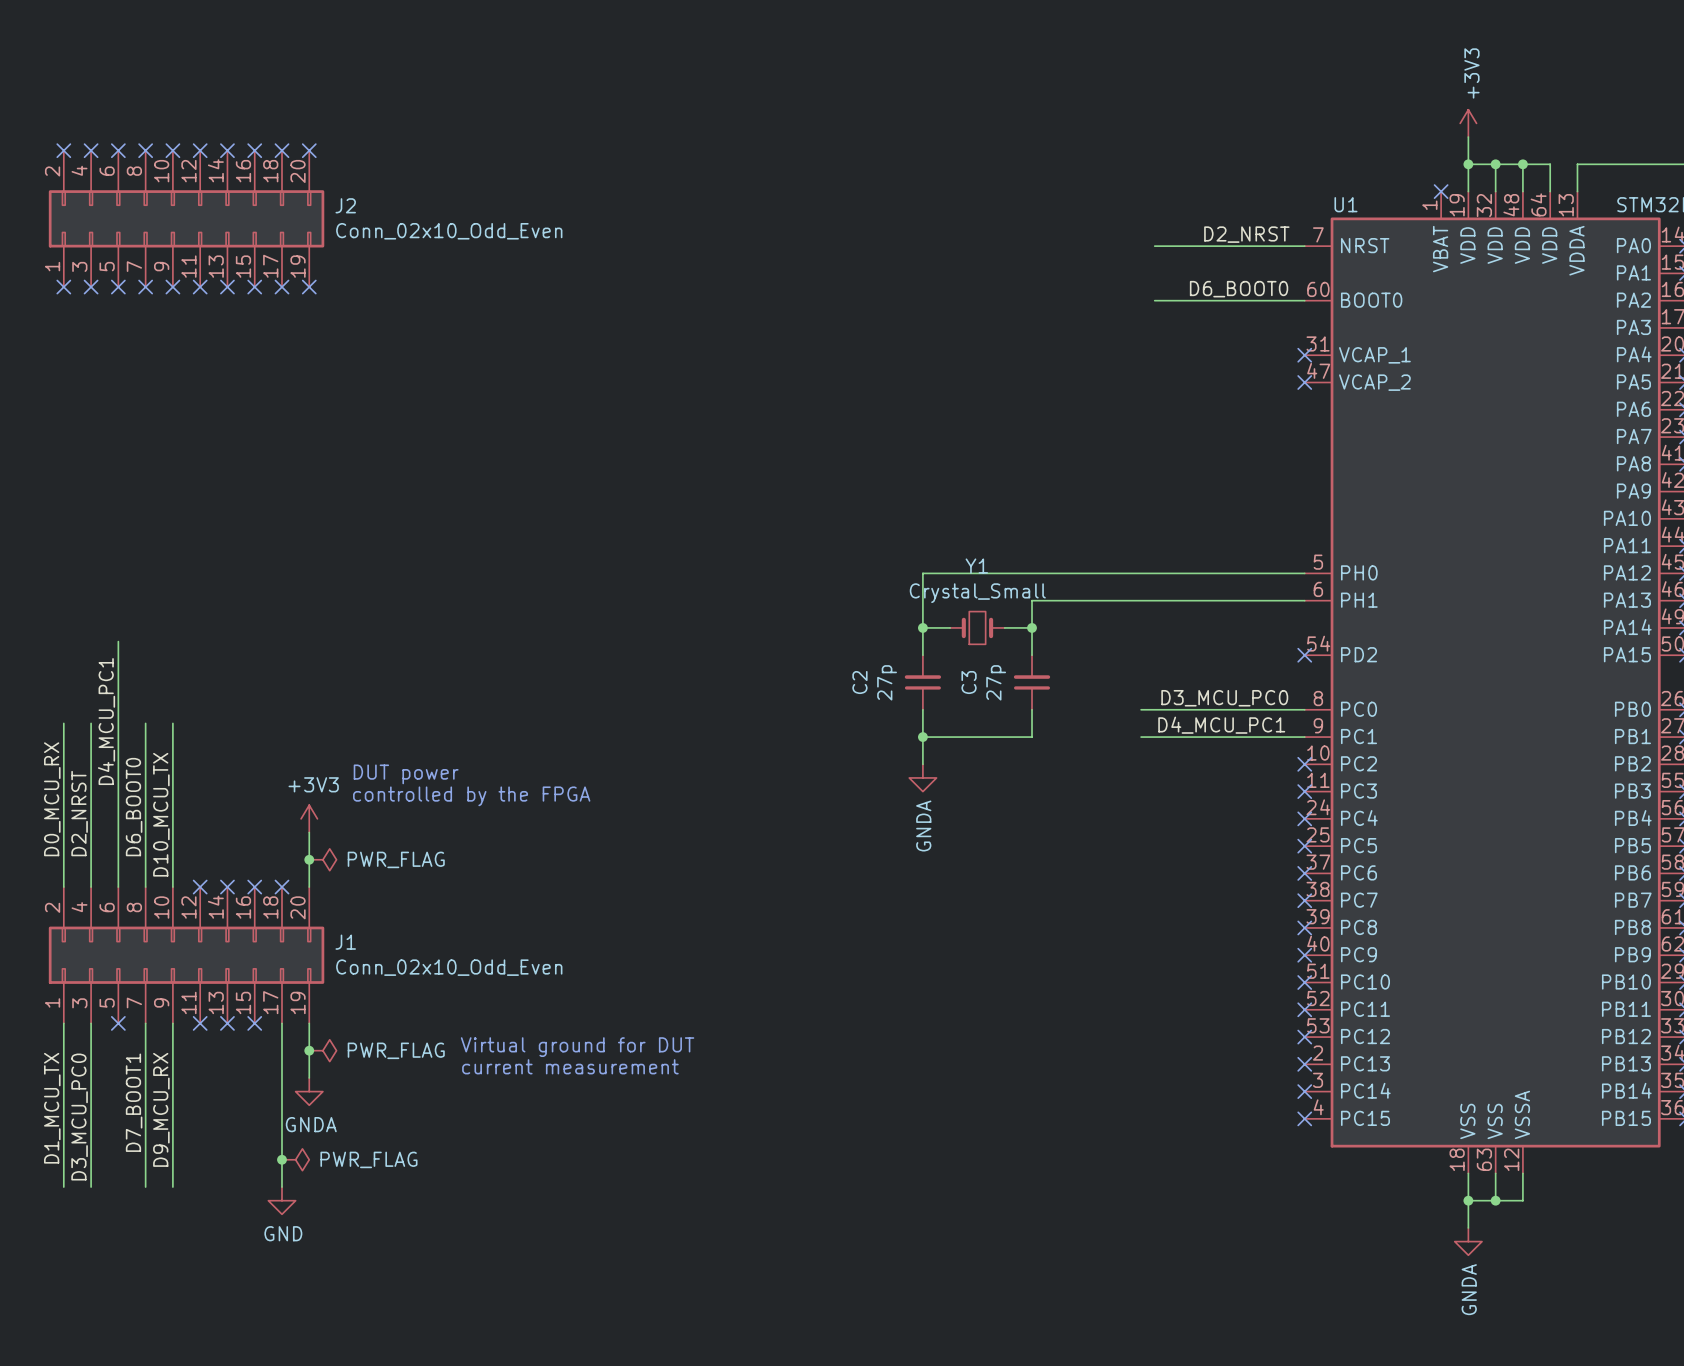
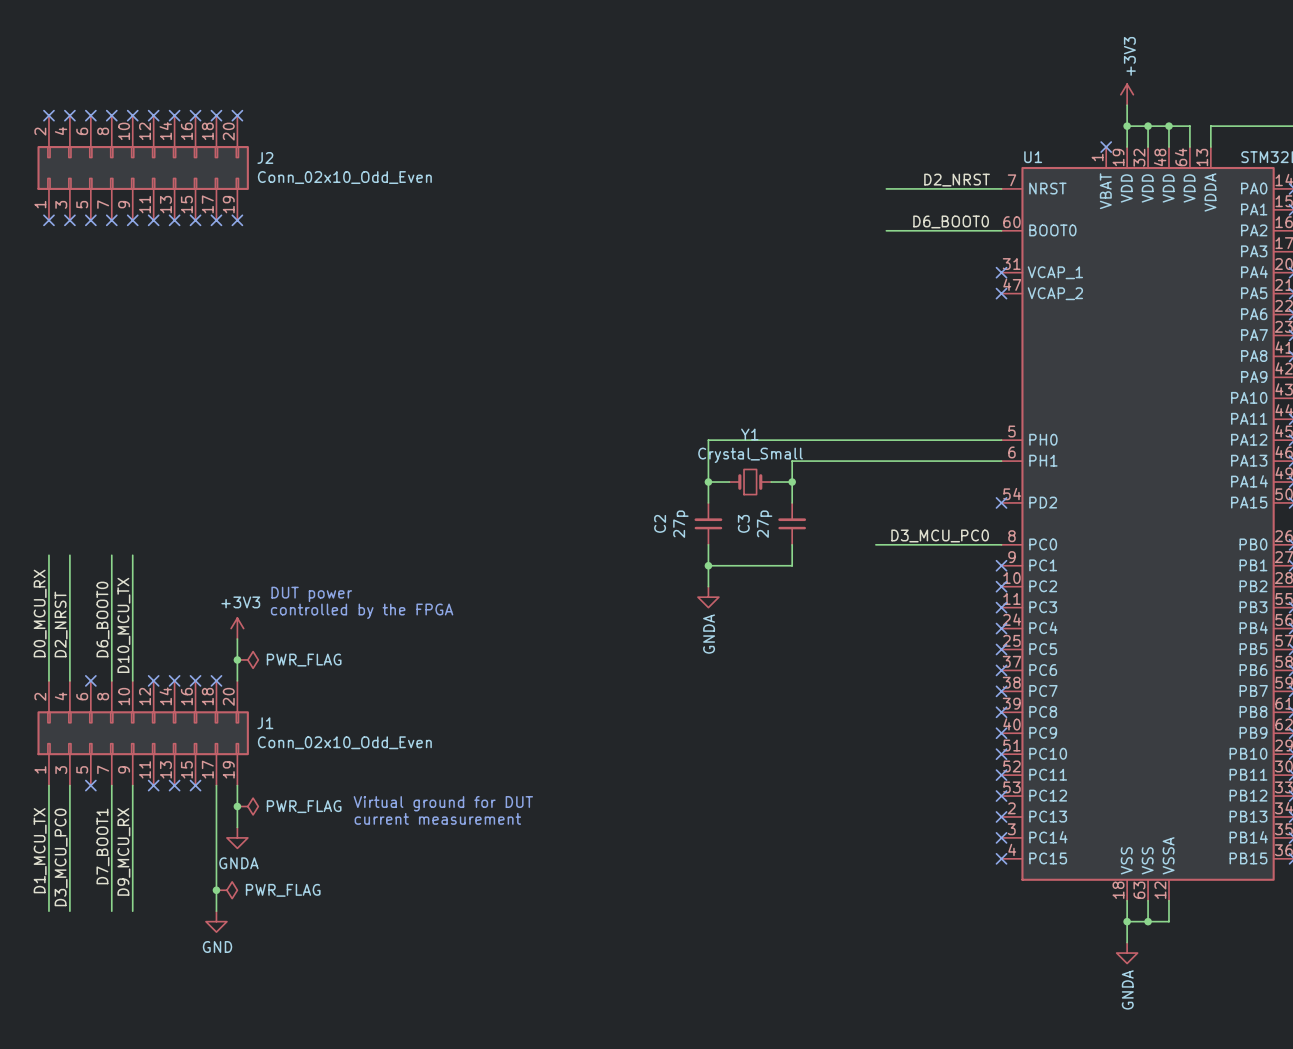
wire: (118, 641) (118, 887) -> none
label: D4_MCU_PC1 (106, 721) -> none
label: D4_MCU_PC1 (1221, 725) -> none
wire: (1141, 737) (1304, 737) -> none
no-connect mark: none -> (1001, 565)
no-connect mark: none -> (90, 680)

